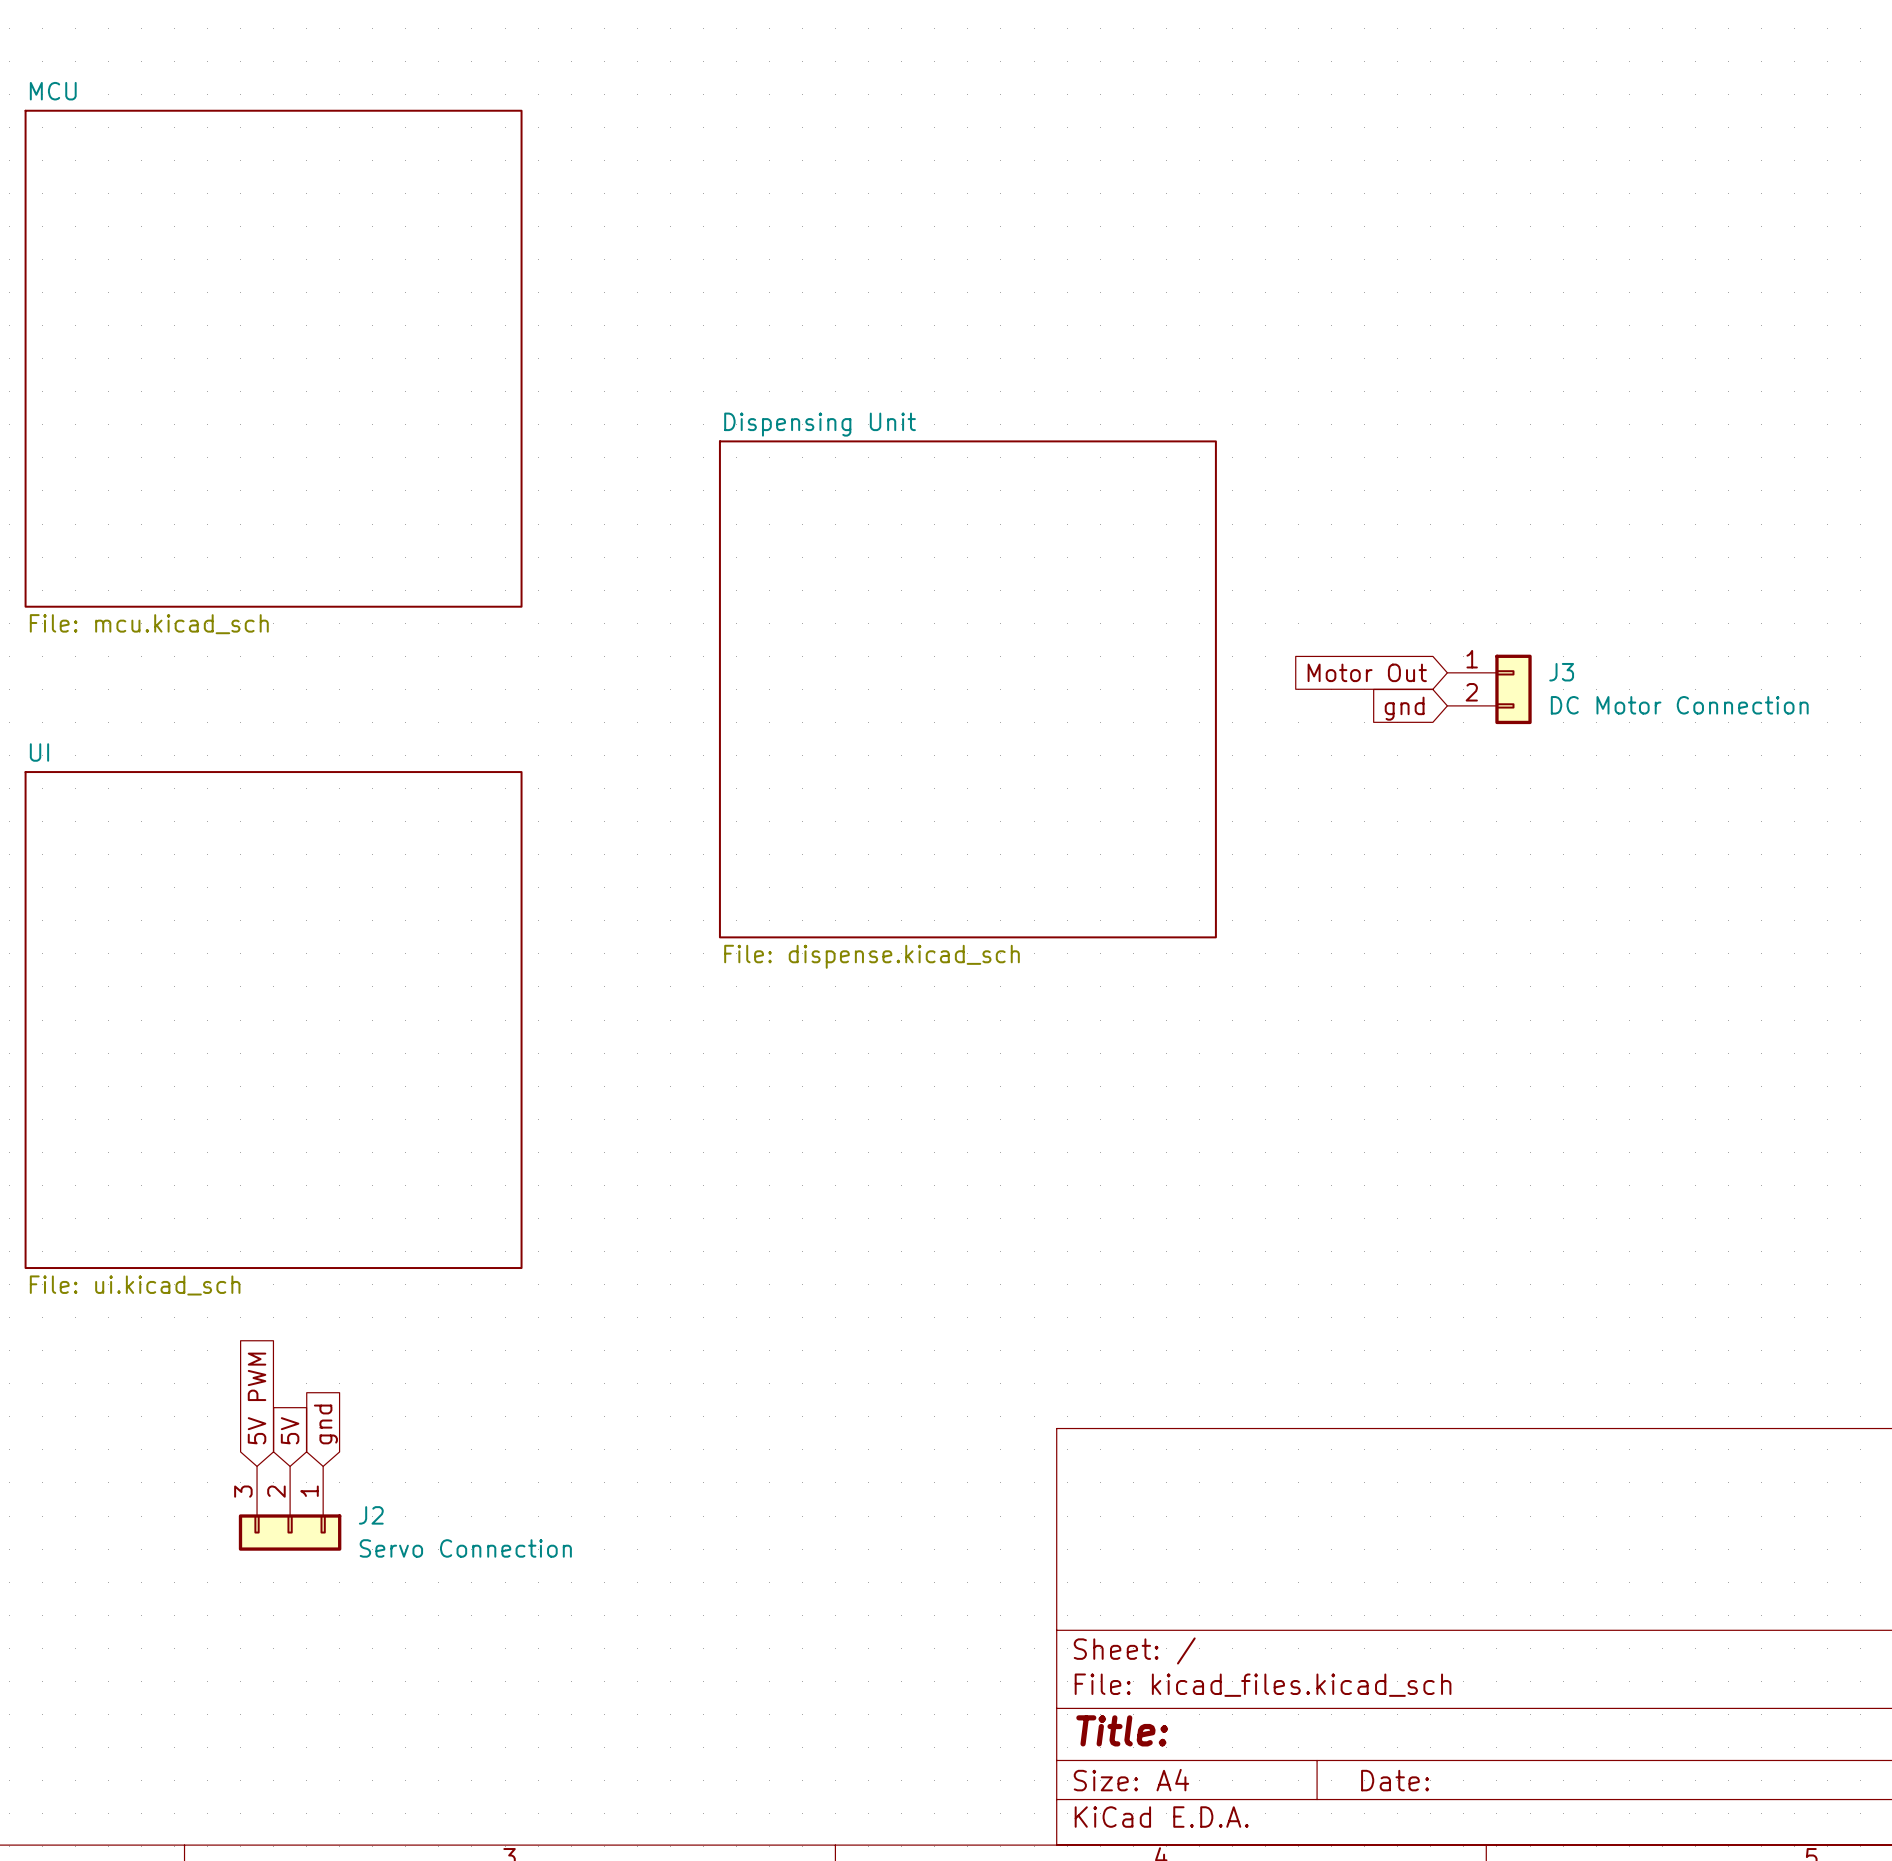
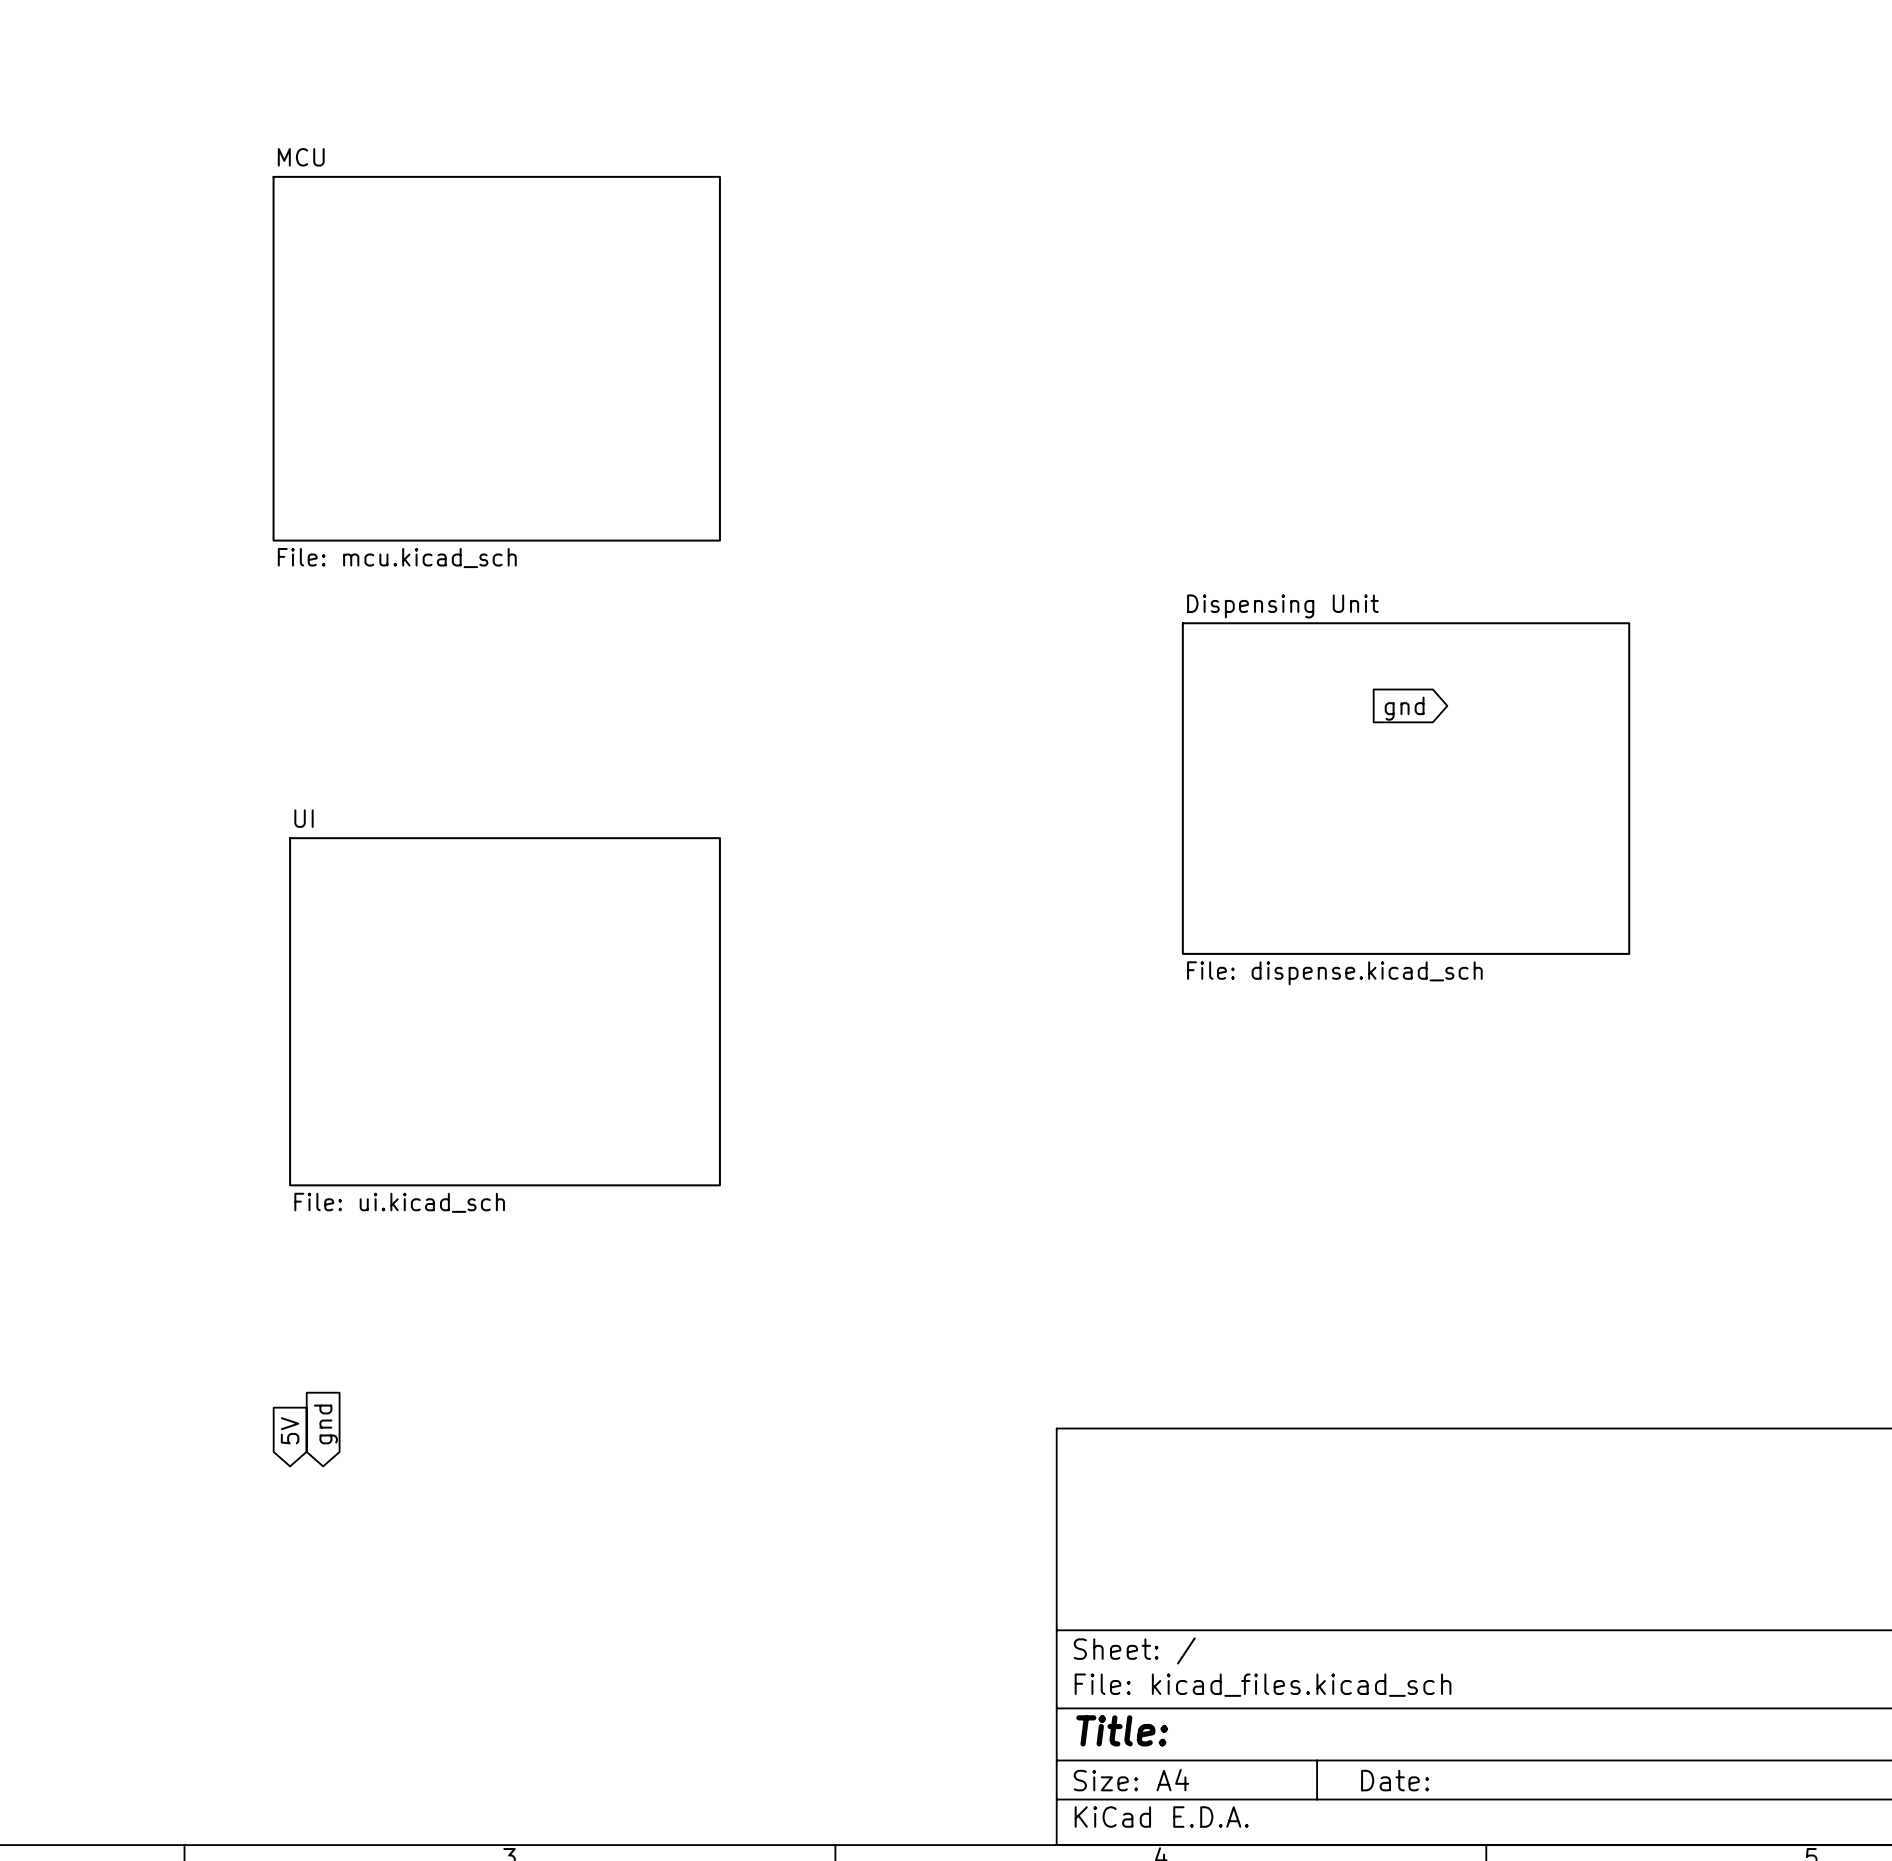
sheet MCU: File: mcu.kicad_sch (273, 358) -> none
sheet MCU: none -> File: mcu.kicad_sch (496, 358)
global label: Motor Out (1367, 672) -> none
sheet Dispensing Unit: File: dispense.kicad_sch (967, 689) -> none
J3: DC Motor Connection (1489, 689) -> none
sheet Dispensing Unit: none -> File: dispense.kicad_sch (1406, 788)
sheet UI: none -> File: ui.kicad_sch (505, 1011)
sheet UI: File: ui.kicad_sch (273, 1020) -> none
global label: 5V PWM (257, 1398) -> none
J2: Servo Connection (290, 1508) -> none

